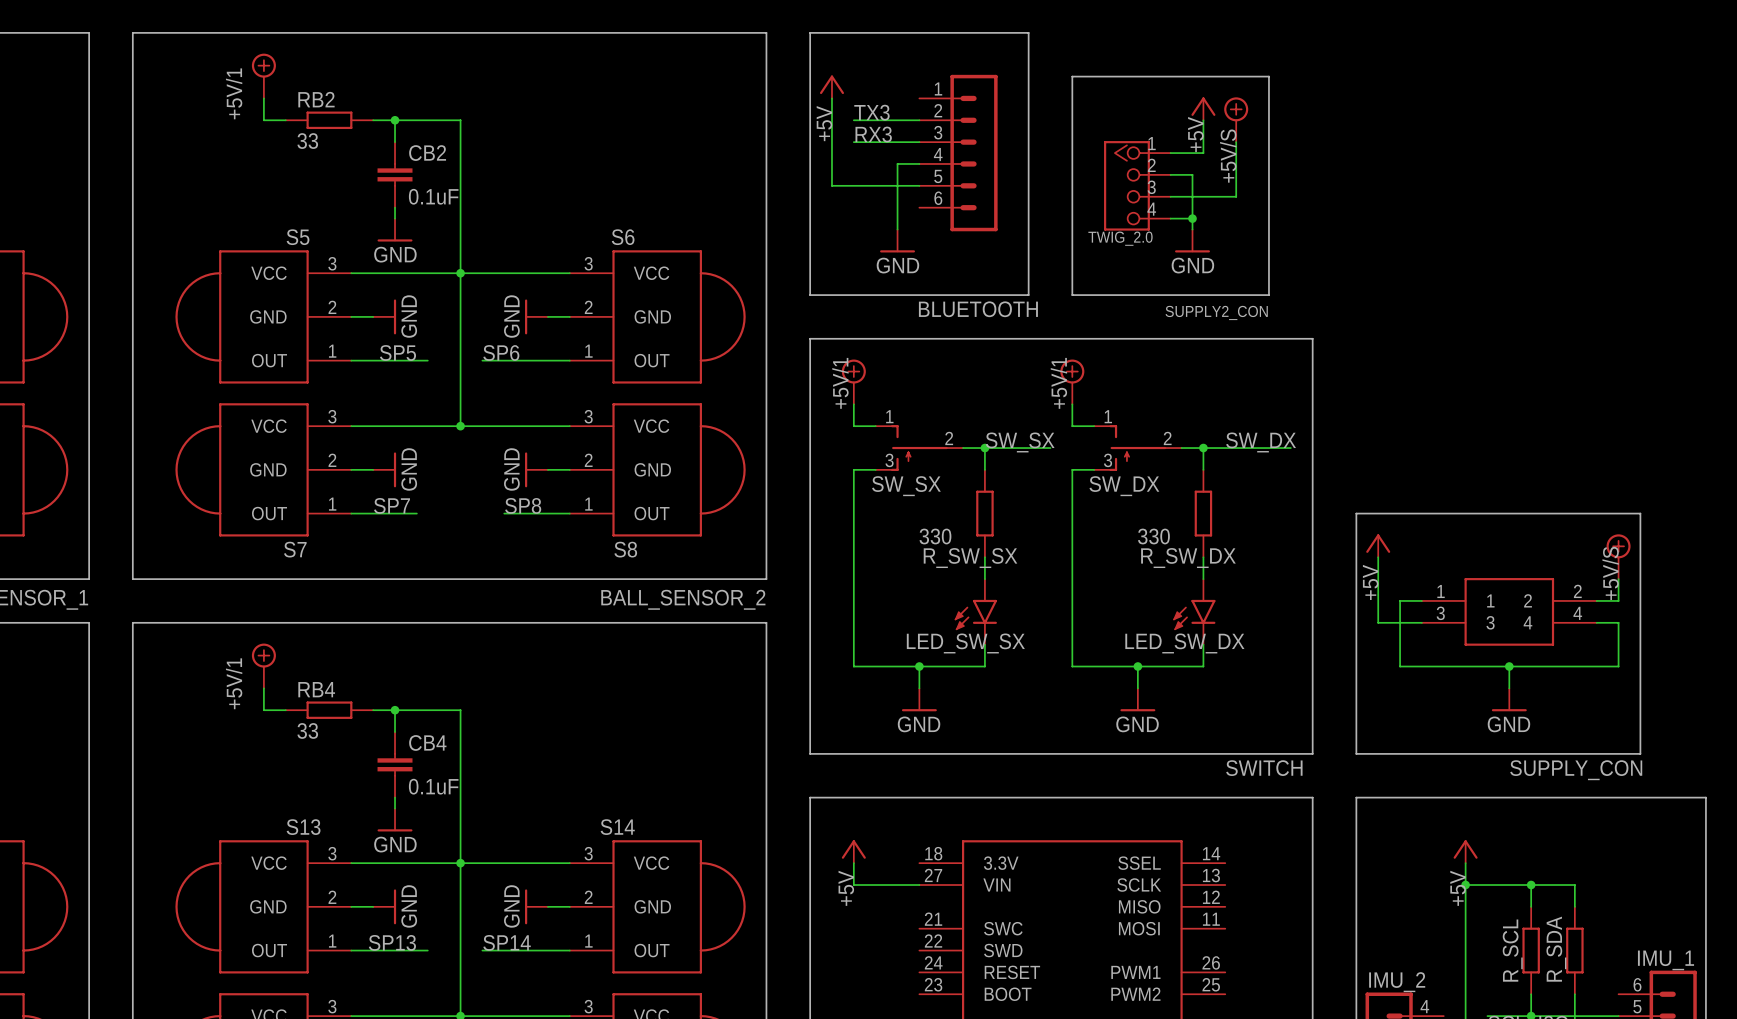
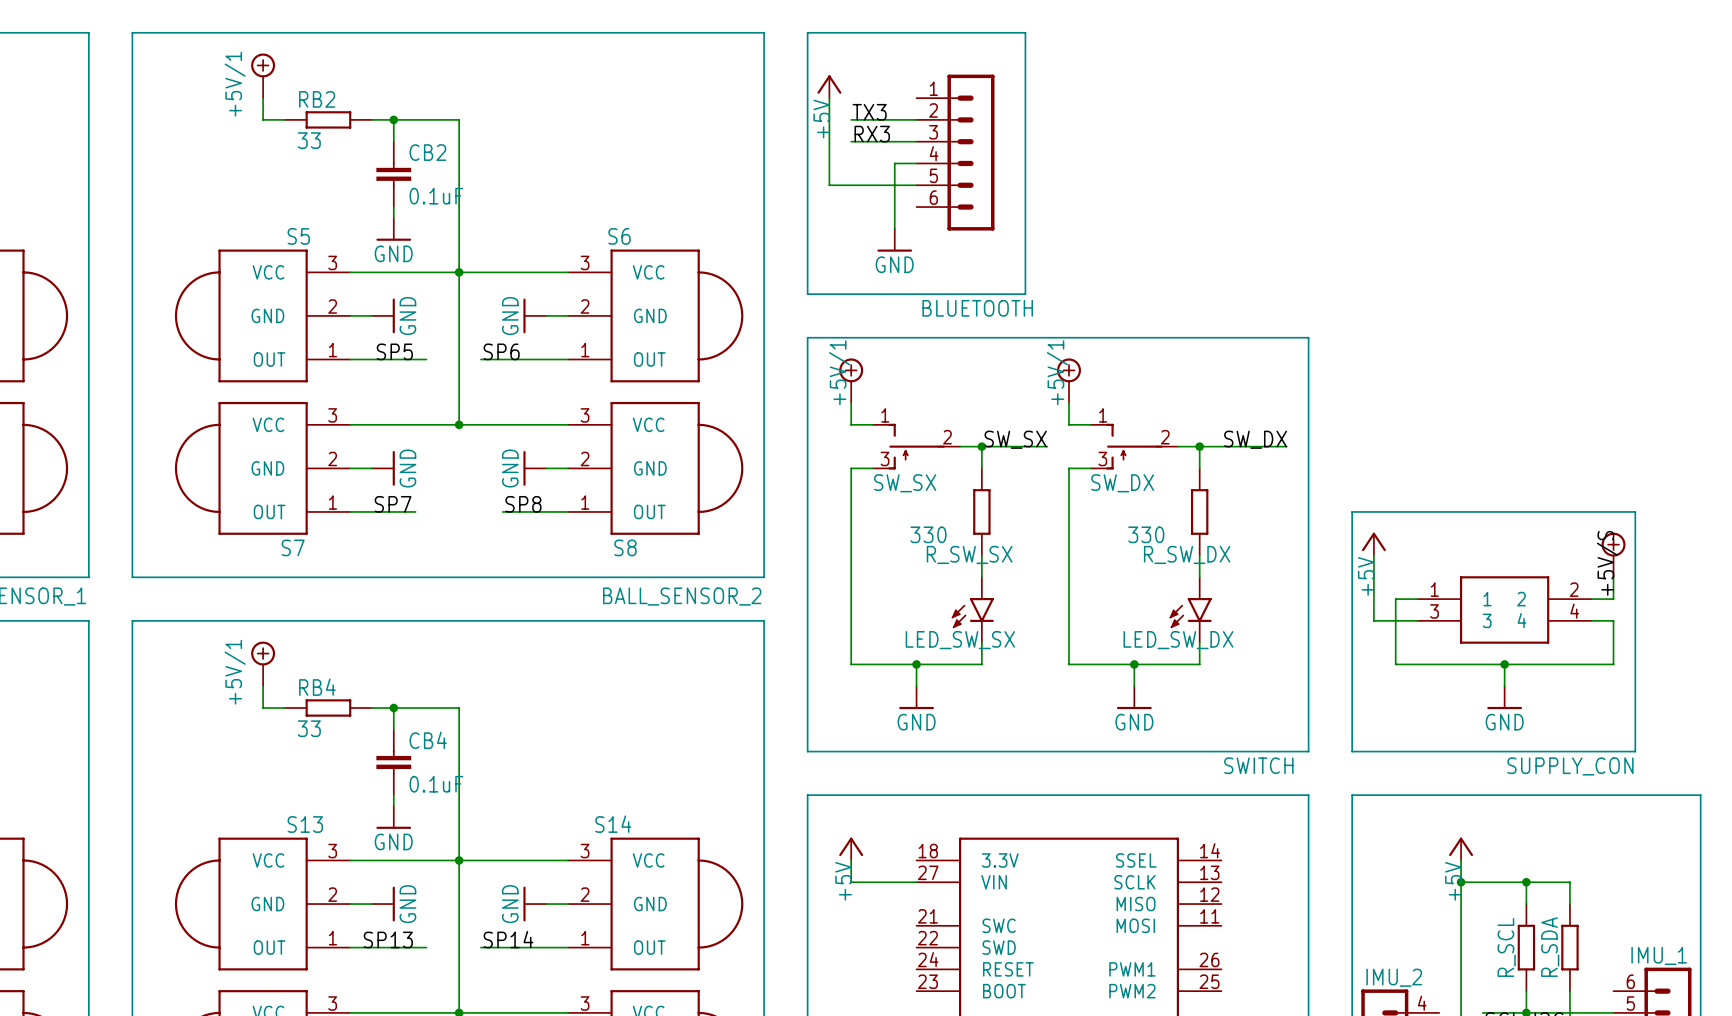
line: (1072, 76) (1268, 76) (1268, 295) (1072, 295) (1072, 76) -> none
power symbol: +5V (1203, 108) -> none
power symbol: (1236, 119) -> none
wire: (1203, 120) (1203, 153) (1170, 153) -> none
wire: (1236, 142) (1236, 196) (1170, 196) -> none
label: +5V/S (1228, 156) -> none
wire: (1170, 174) (1192, 174) (1192, 229) -> none
SUPPLY2_CON: TWIG_2.0 (1137, 185) -> none
wire: (1170, 218) (1192, 218) -> none
junction: (1192, 218) -> none
power symbol: GND (1192, 241) -> none

